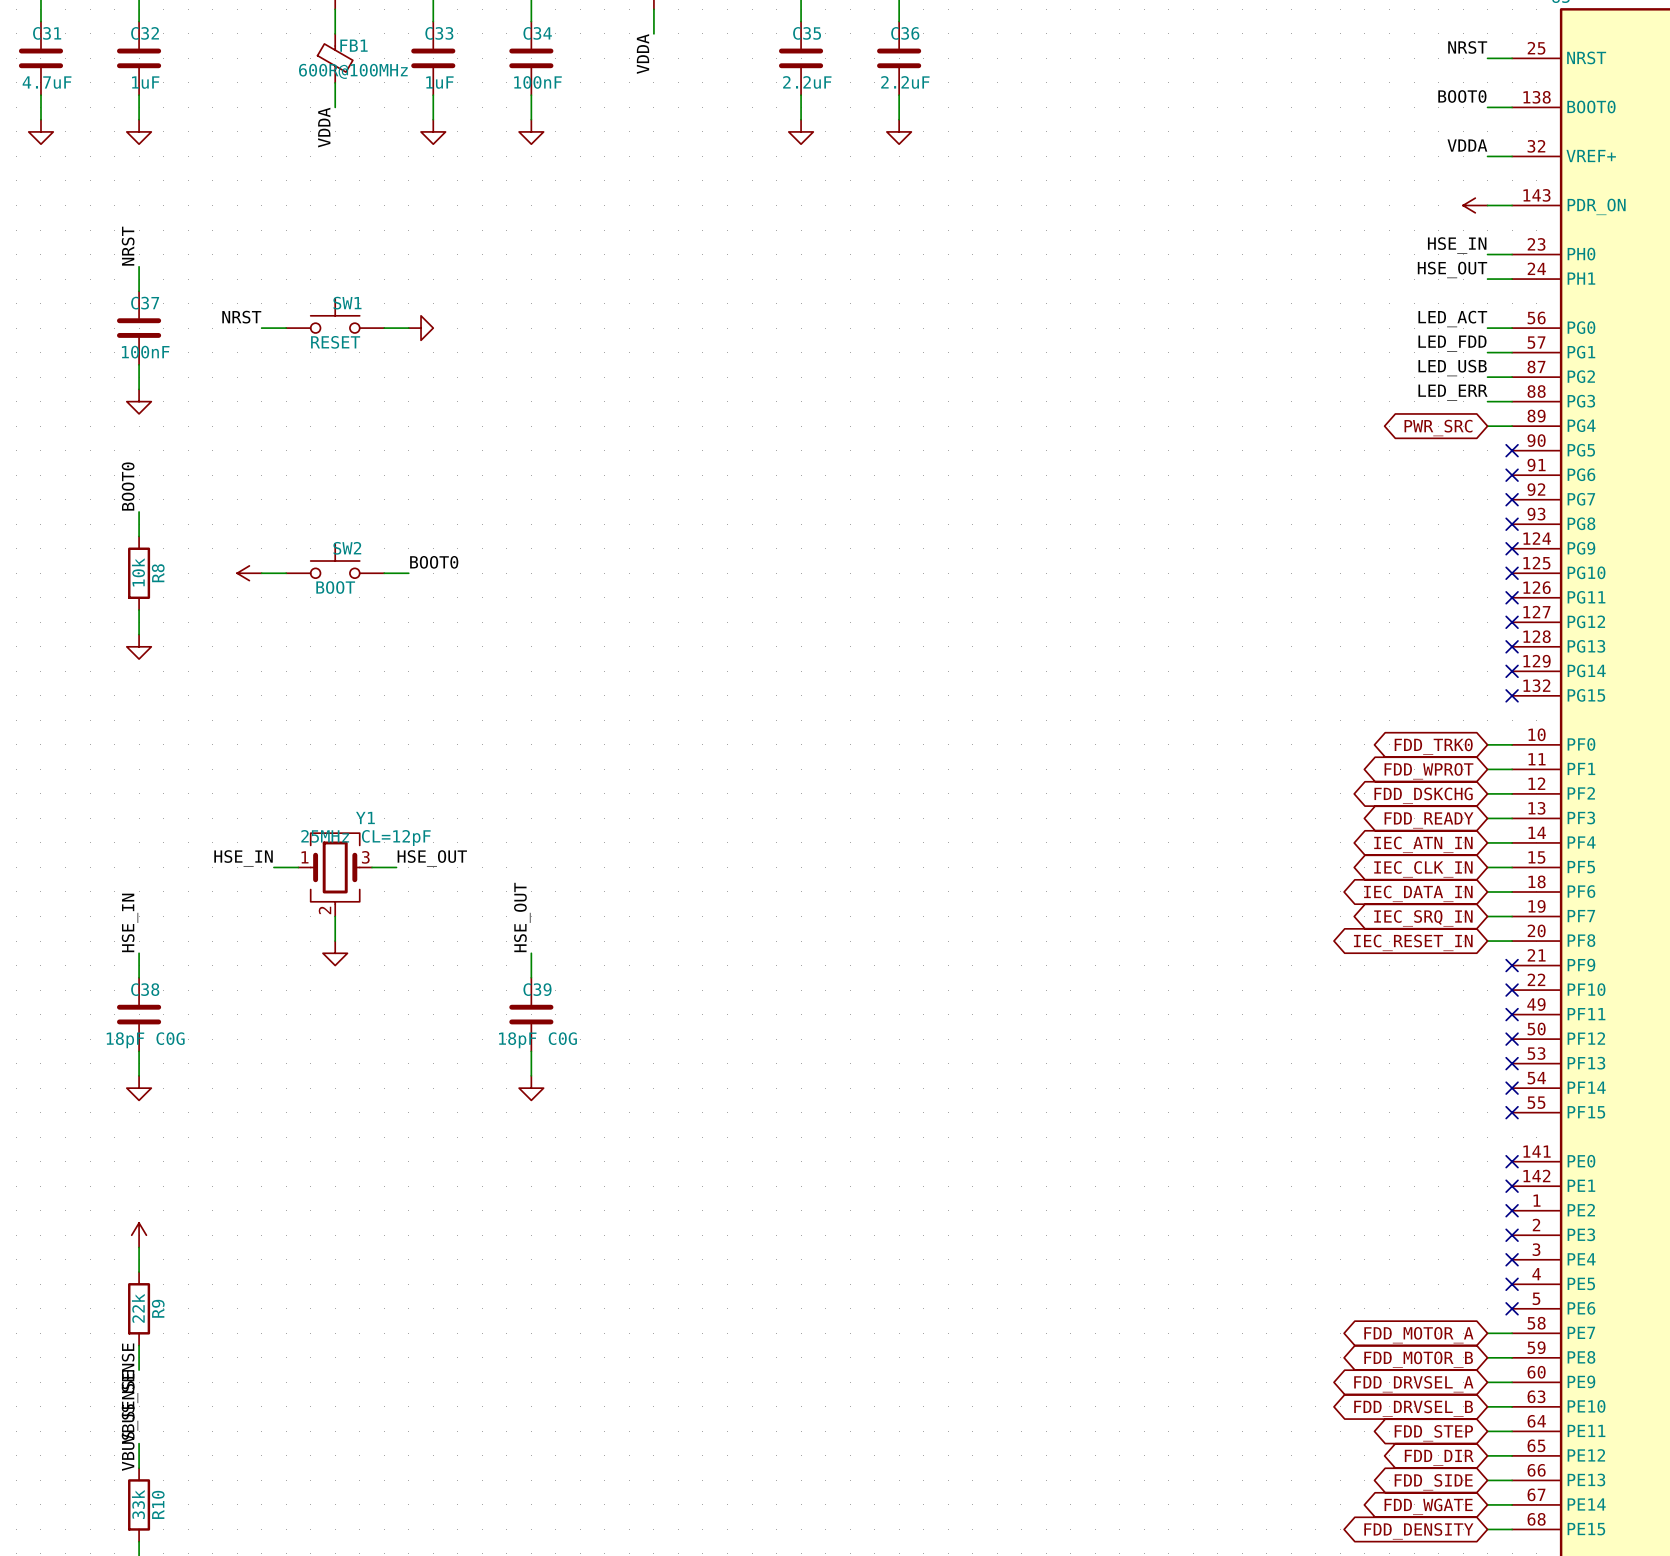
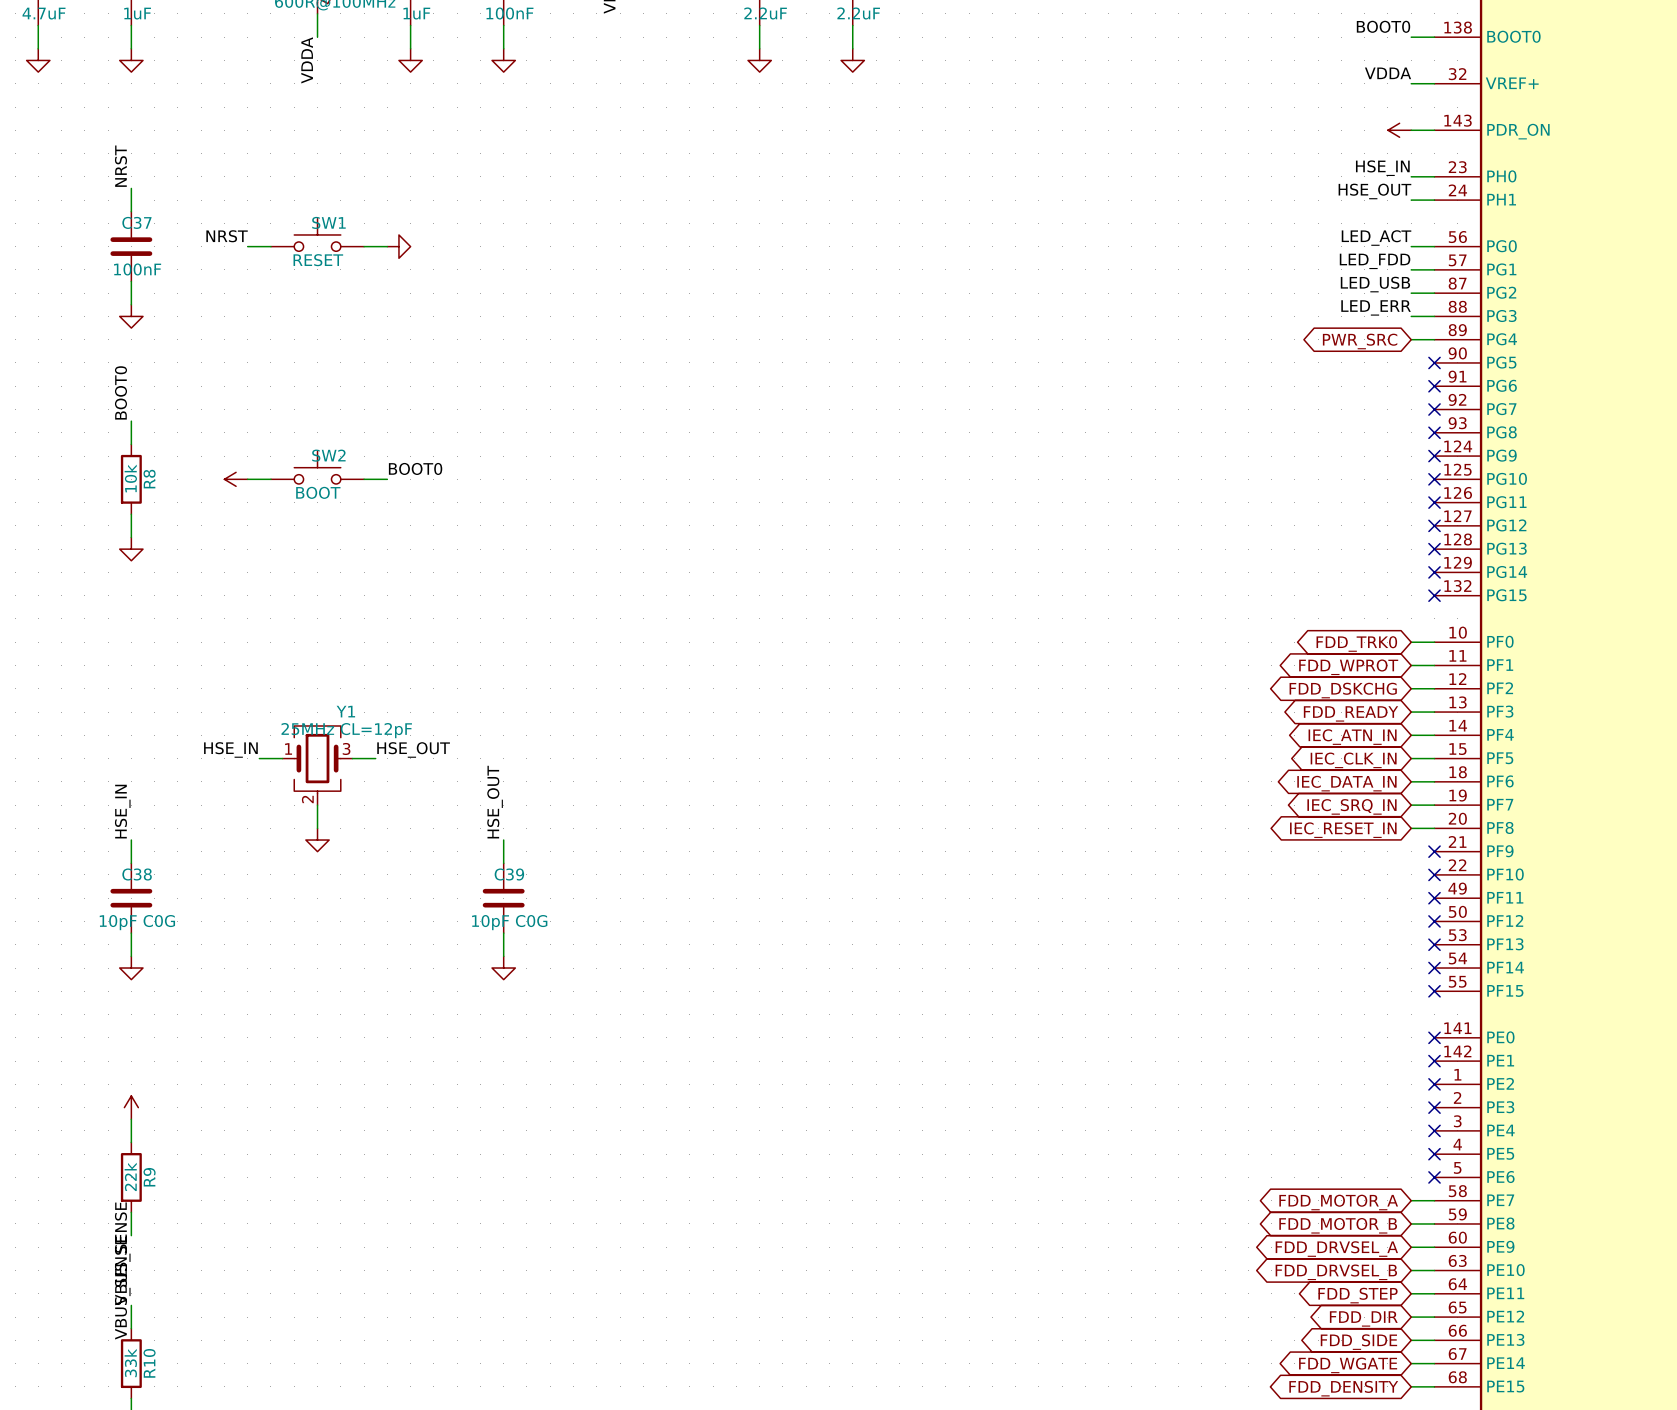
C38 value: 18pF C0G (145, 1040) -> 10pF C0G (137, 922)
C39 value: 18pF C0G (537, 1040) -> 10pF C0G (509, 922)

